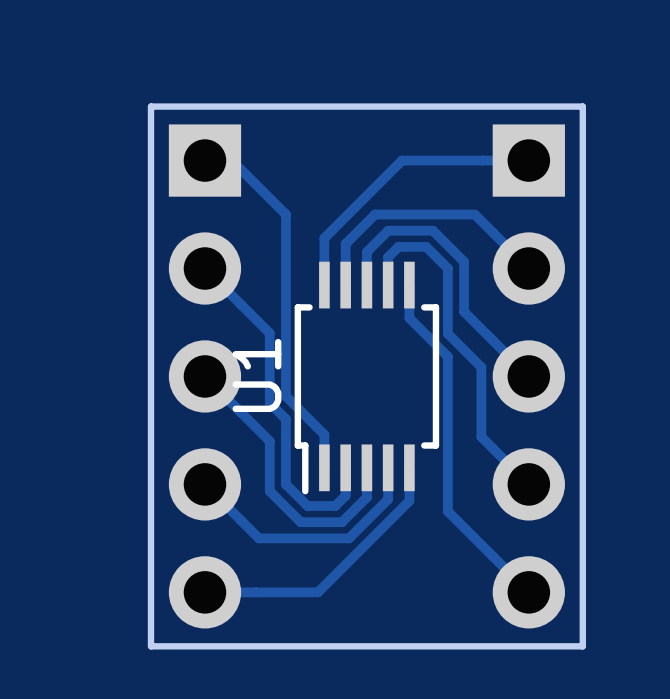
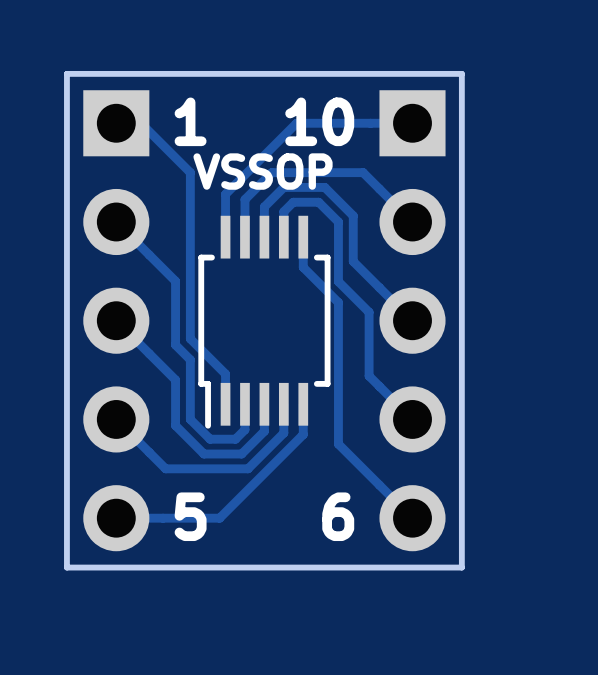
text: none -> 1 (190, 121)
text: none -> 10 (319, 121)
U1 name: U1 (256, 375) -> VSSOP (263, 171)
text: none -> 5 (190, 516)
text: none -> 6 (338, 516)

